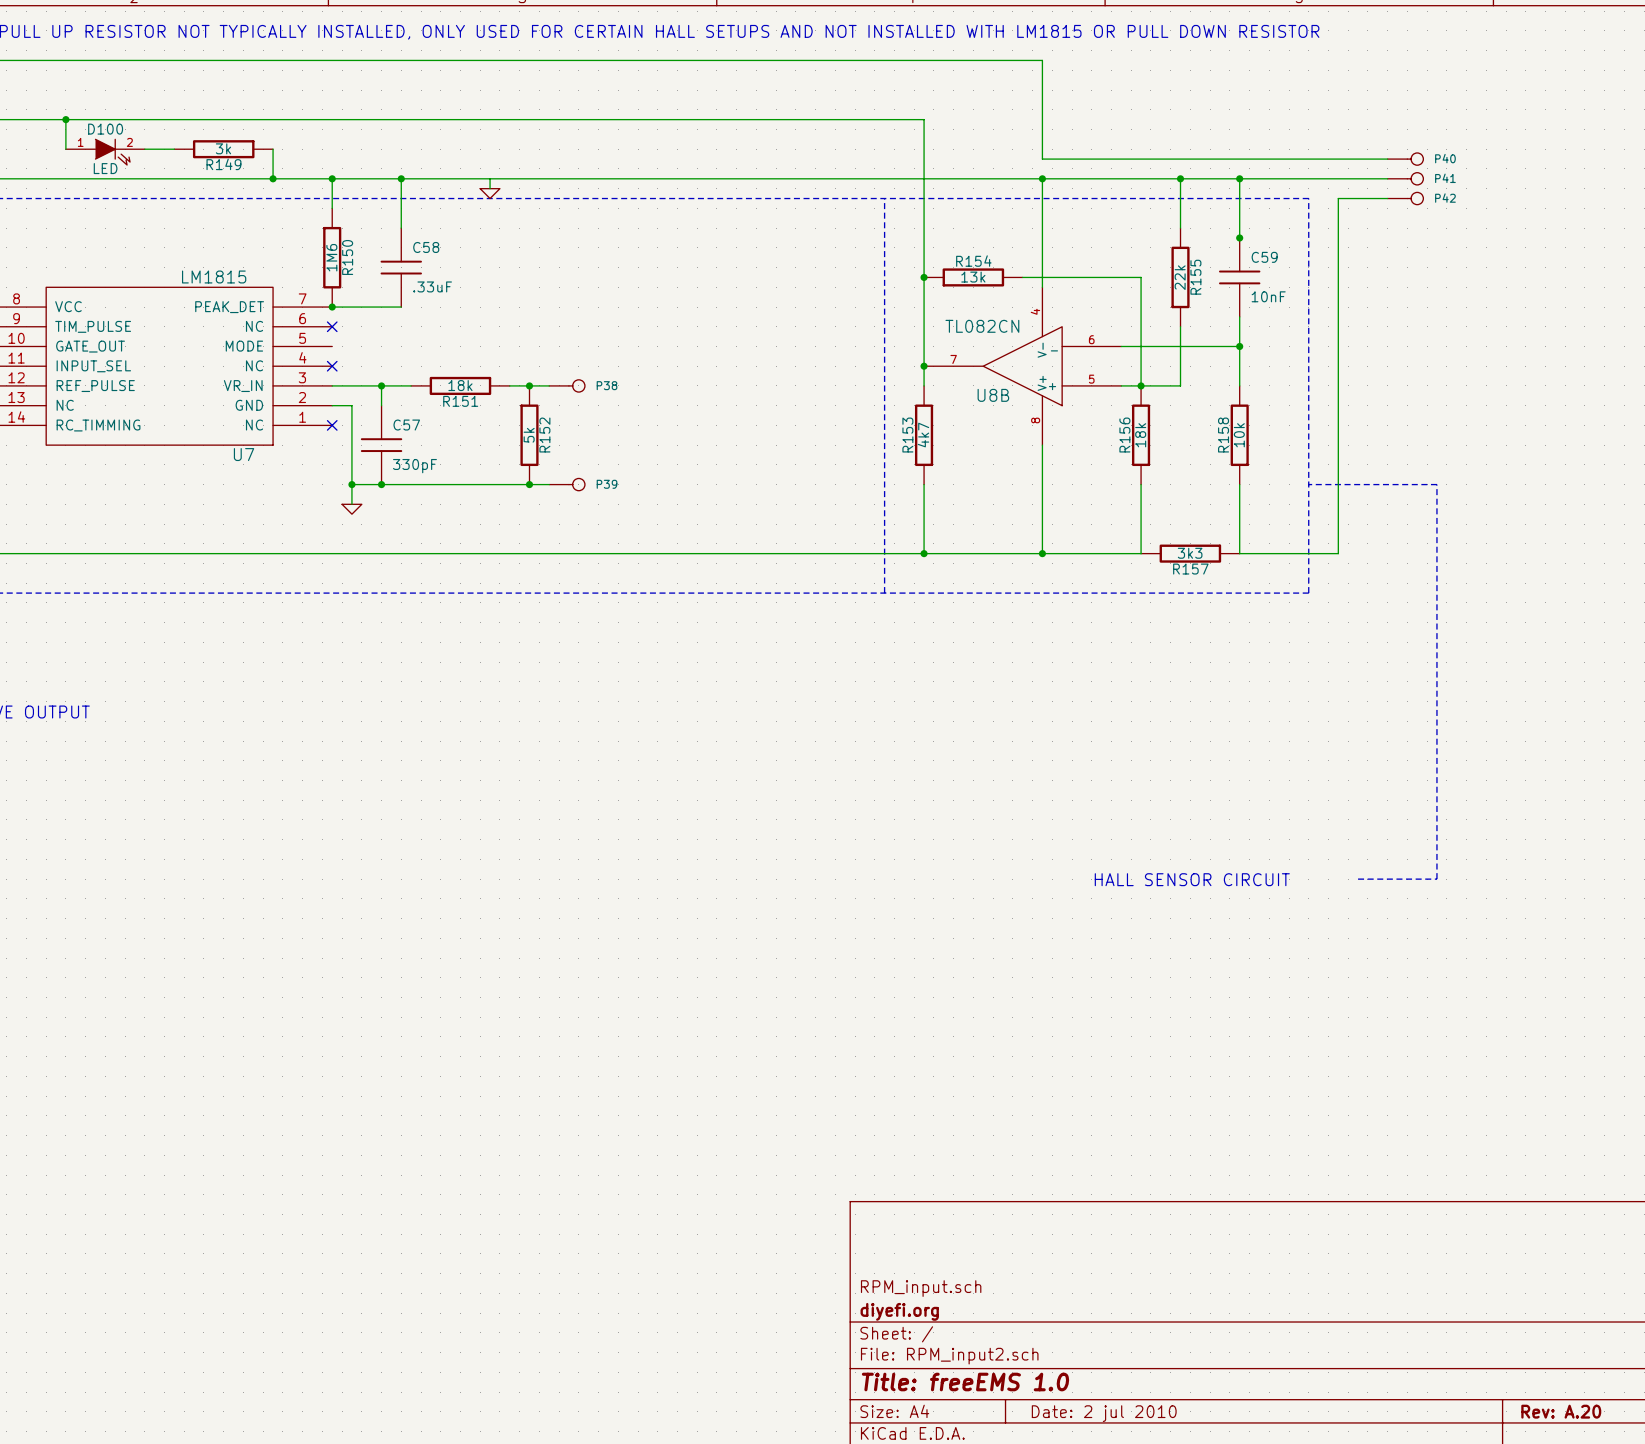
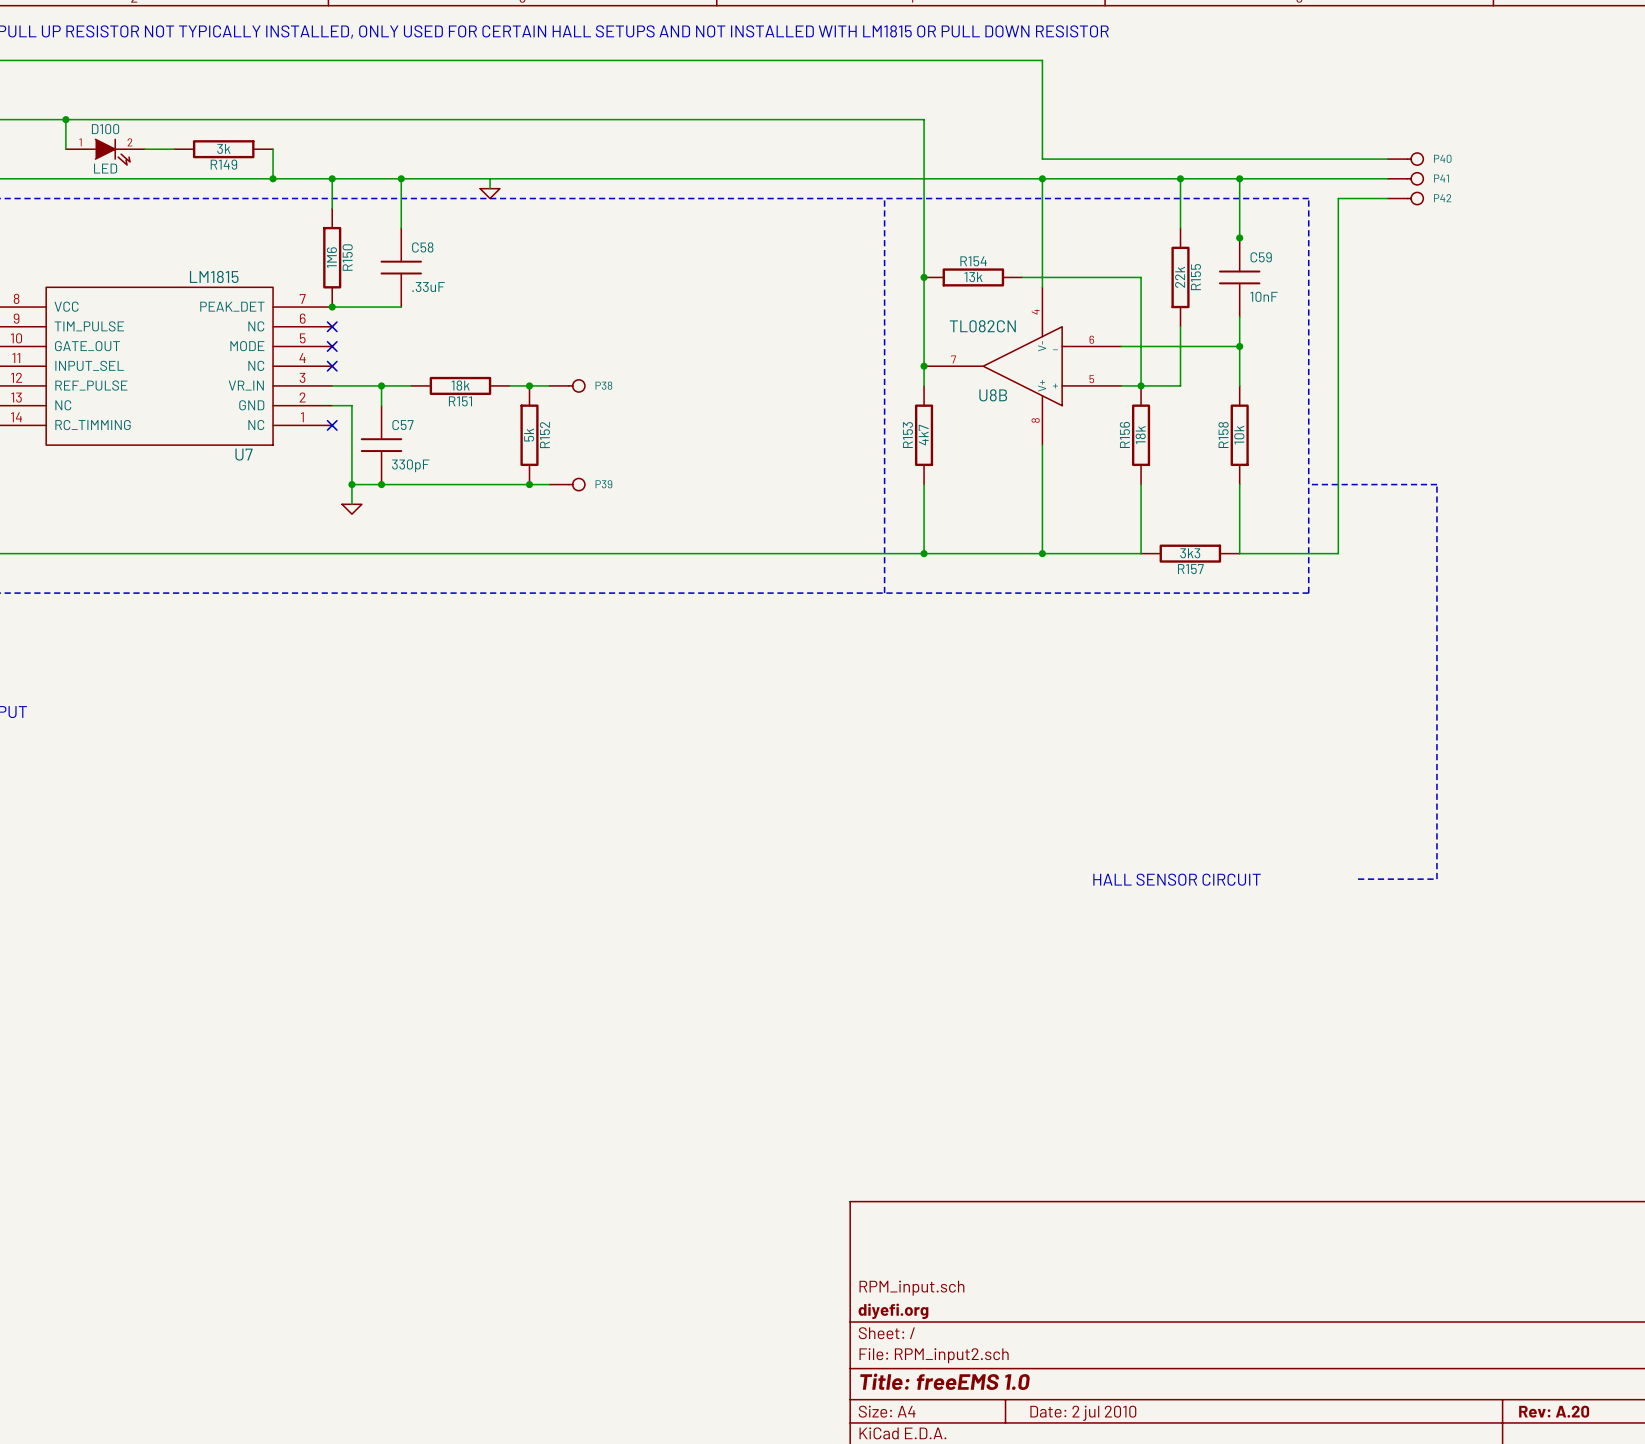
no-connect mark: none -> (332, 346)

